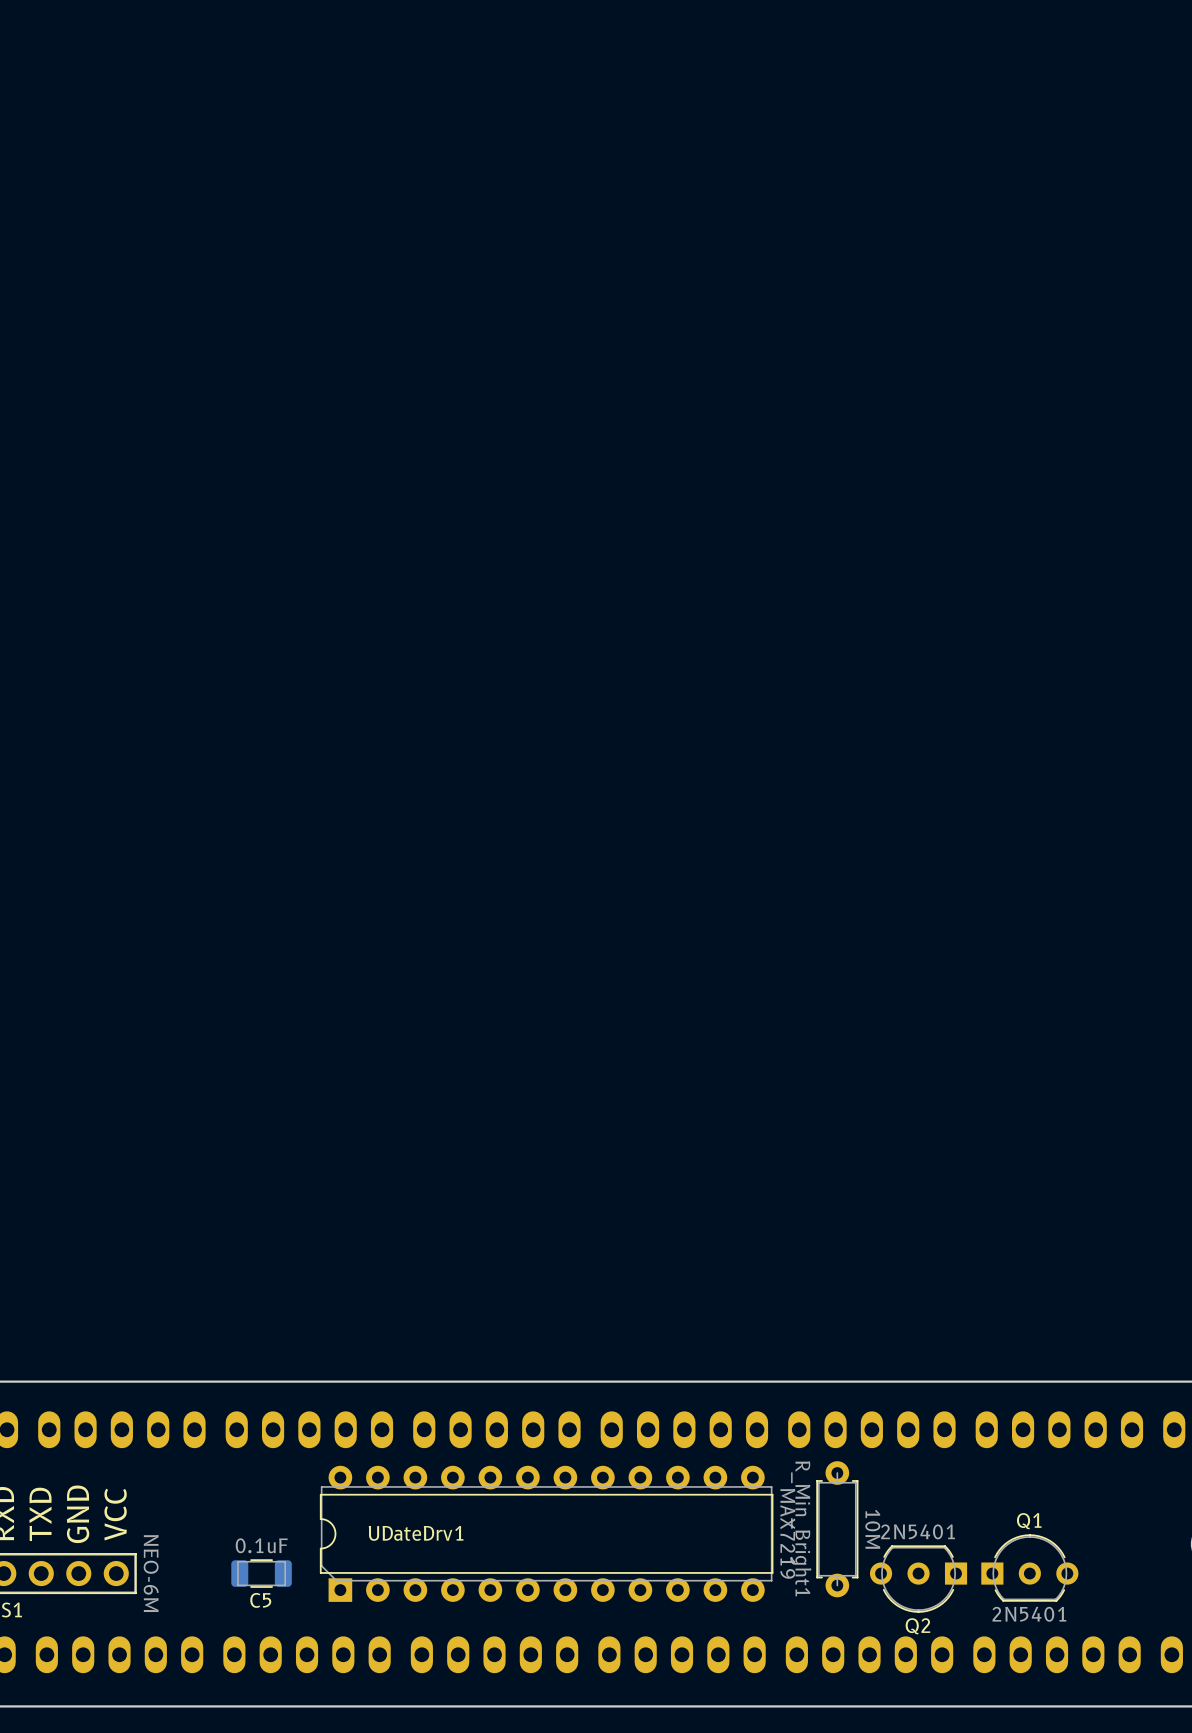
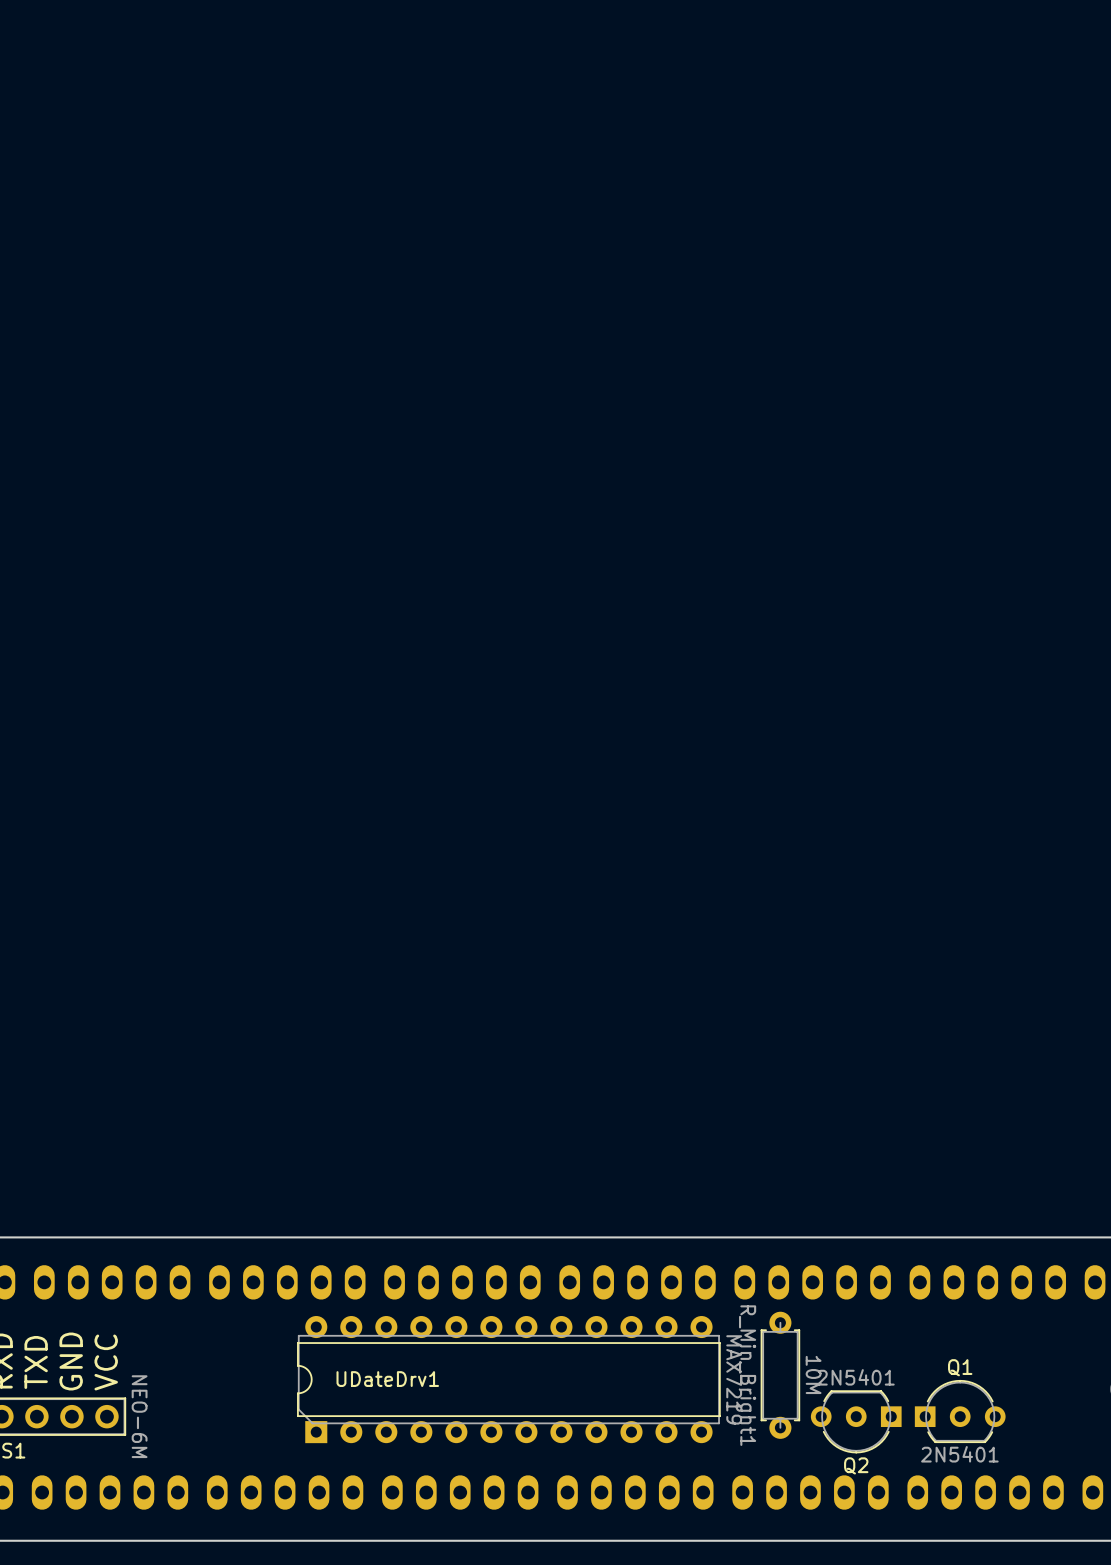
C5: 0.1uF (261, 1573) -> none

